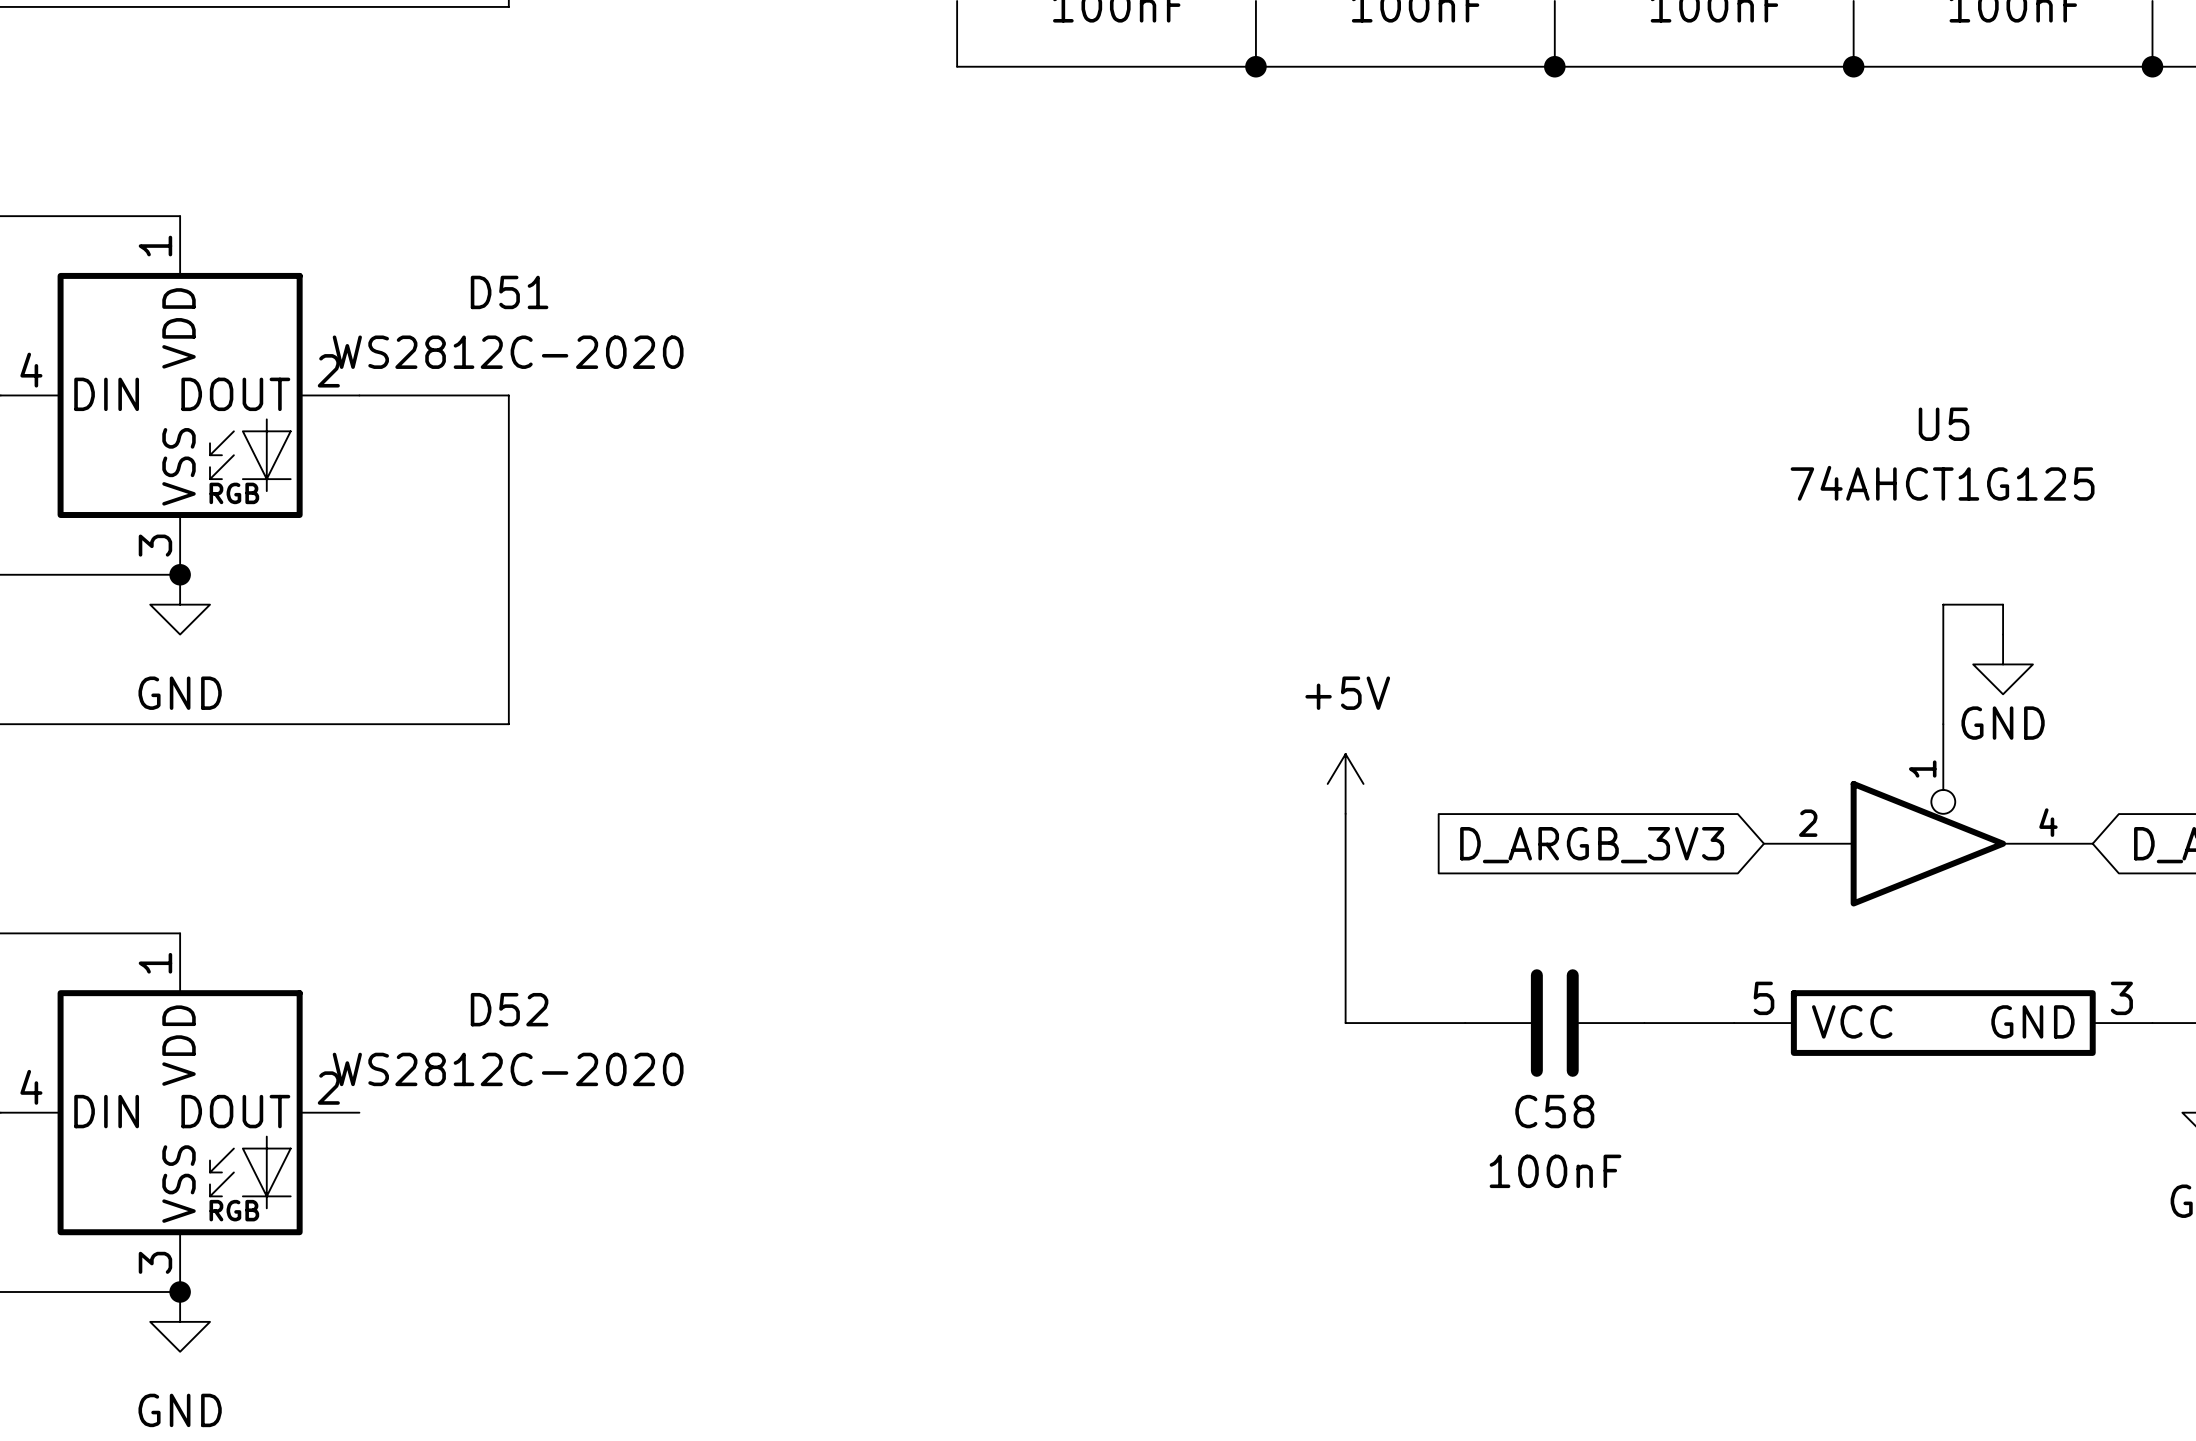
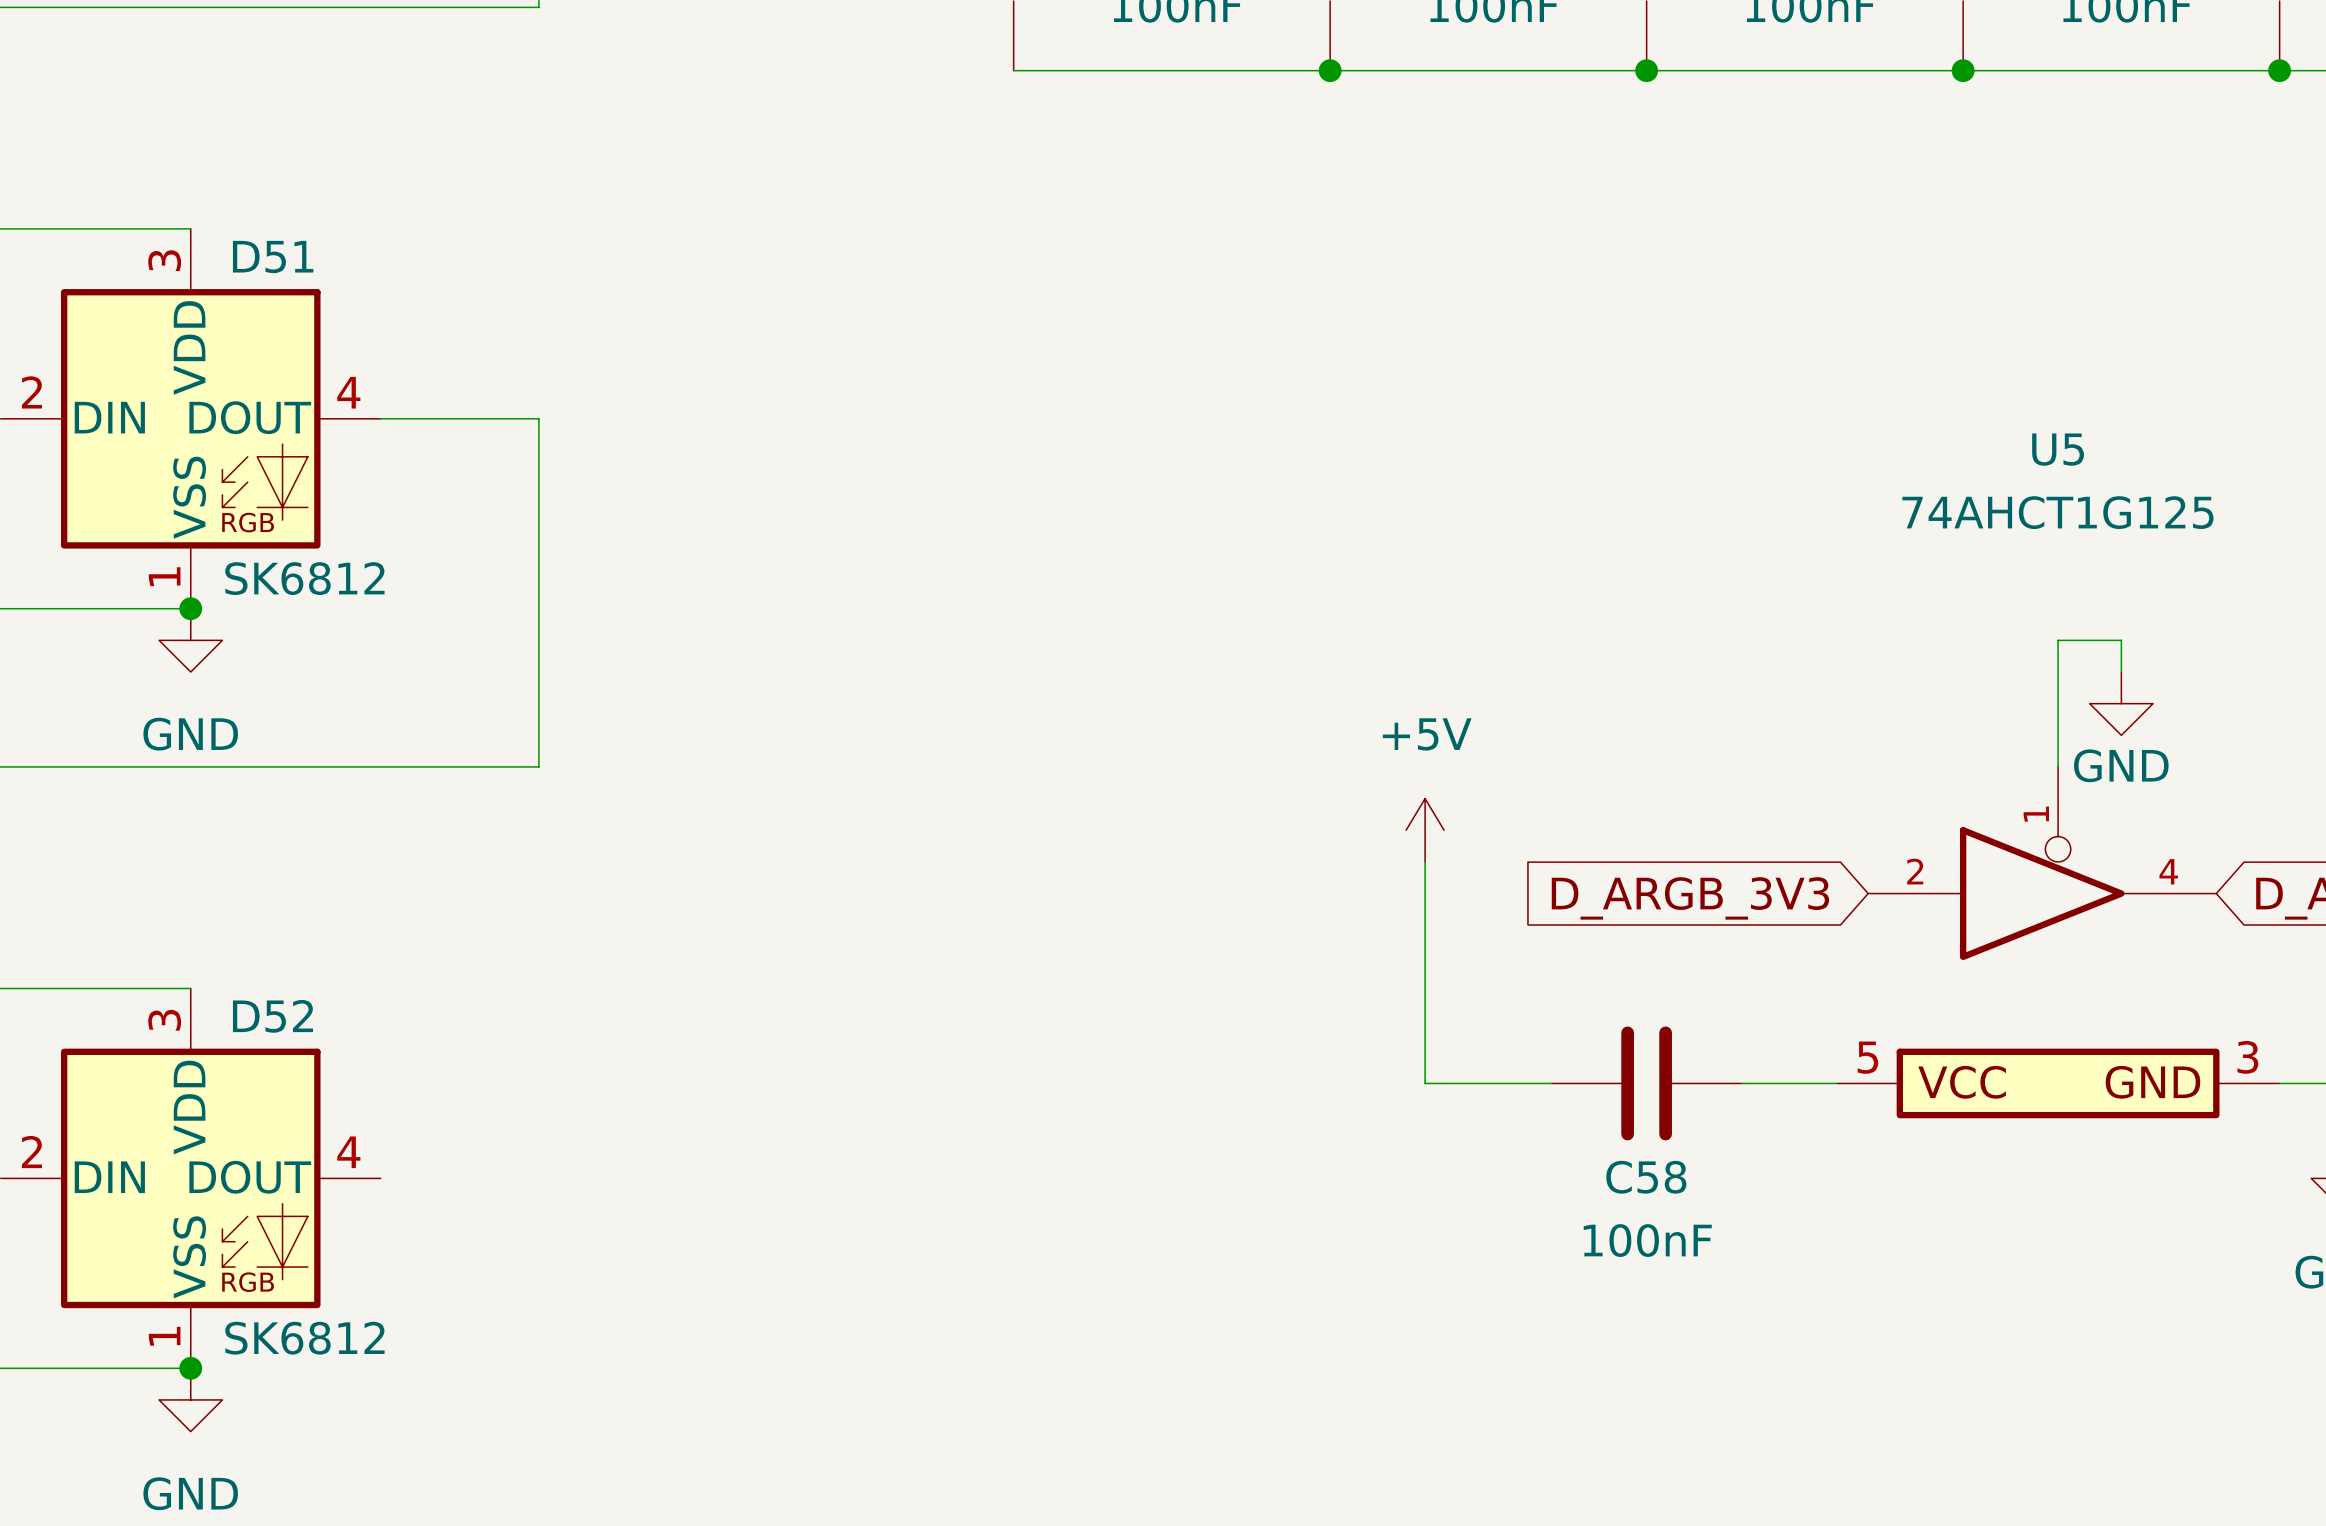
D51 pin number: 1 (155, 246) -> 3 (164, 260)
D51 name position: D51 (509, 292) -> D51 (273, 257)
D51 value: WS2812C-2020 (508, 352) -> SK6812 (304, 578)
D51 pin number: 4 (31, 370) -> 2 (31, 392)
D51 pin number: 2 (328, 370) -> 4 (348, 392)
D51 pin number: 3 (155, 545) -> 1 (164, 576)
D52 pin number: 1 (155, 963) -> 3 (164, 1020)
D52 name position: D52 (509, 1009) -> D52 (272, 1016)
D52 value: WS2812C-2020 (508, 1069) -> SK6812 (304, 1338)
D52 pin number: 4 (31, 1087) -> 2 (31, 1152)
D52 pin number: 2 (328, 1088) -> 4 (348, 1152)
D52 pin number: 3 (155, 1262) -> 1 (164, 1336)

